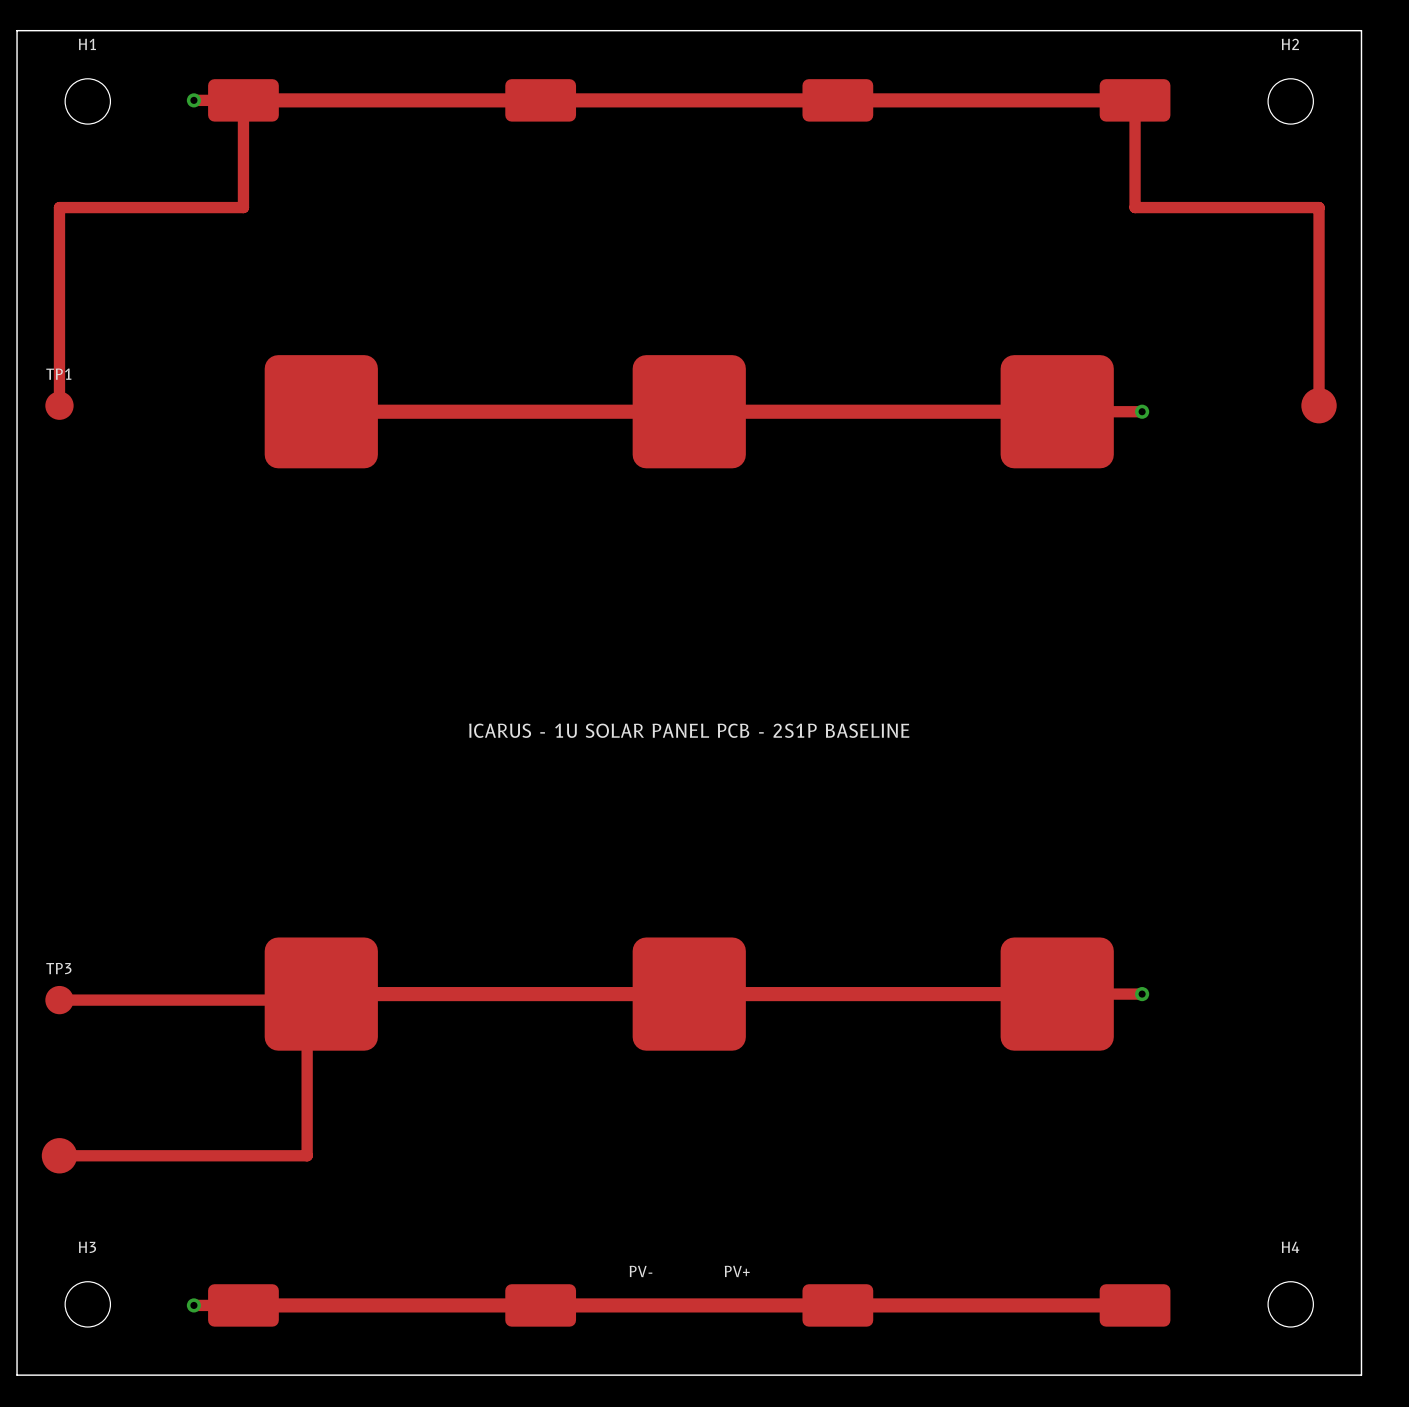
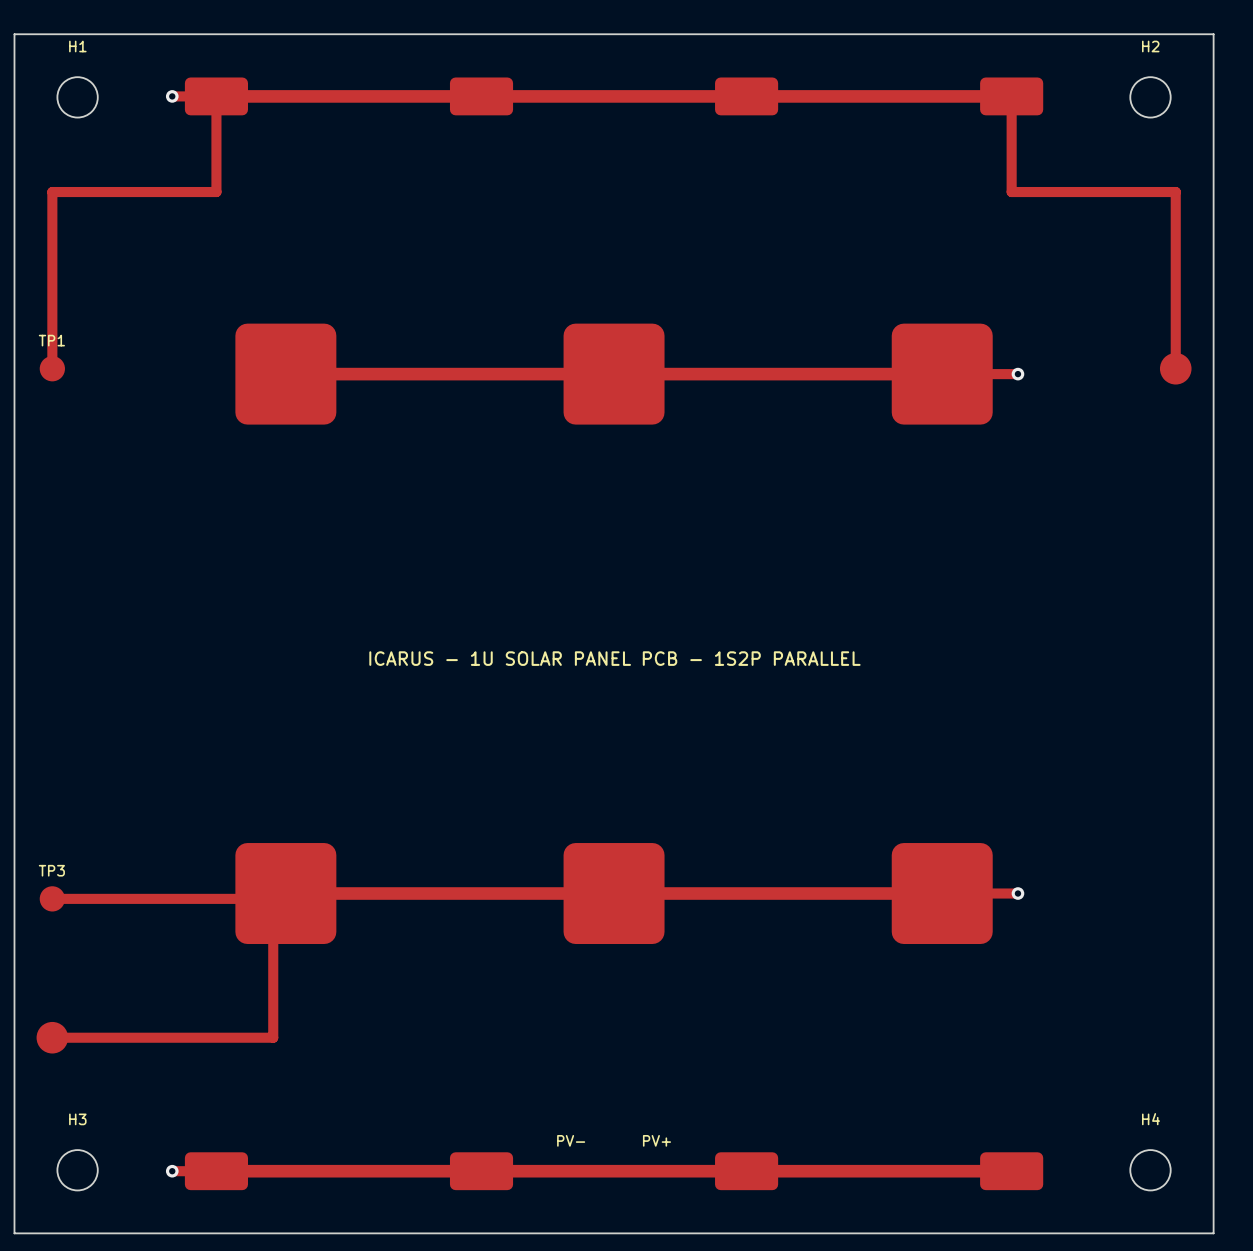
text: ICARUS - 1U SOLAR PANEL PCB - 2S1P BASELINE (689, 730) -> ICARUS - 1U SOLAR PANEL PCB - 1S2P PARALLEL (614, 658)

